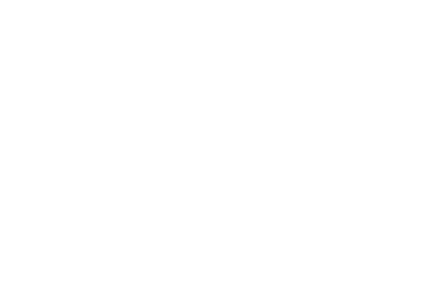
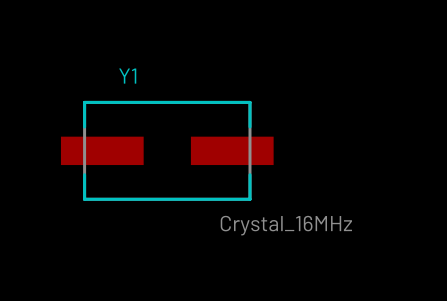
Y1: none -> Crystal_16MHz (167, 150)

